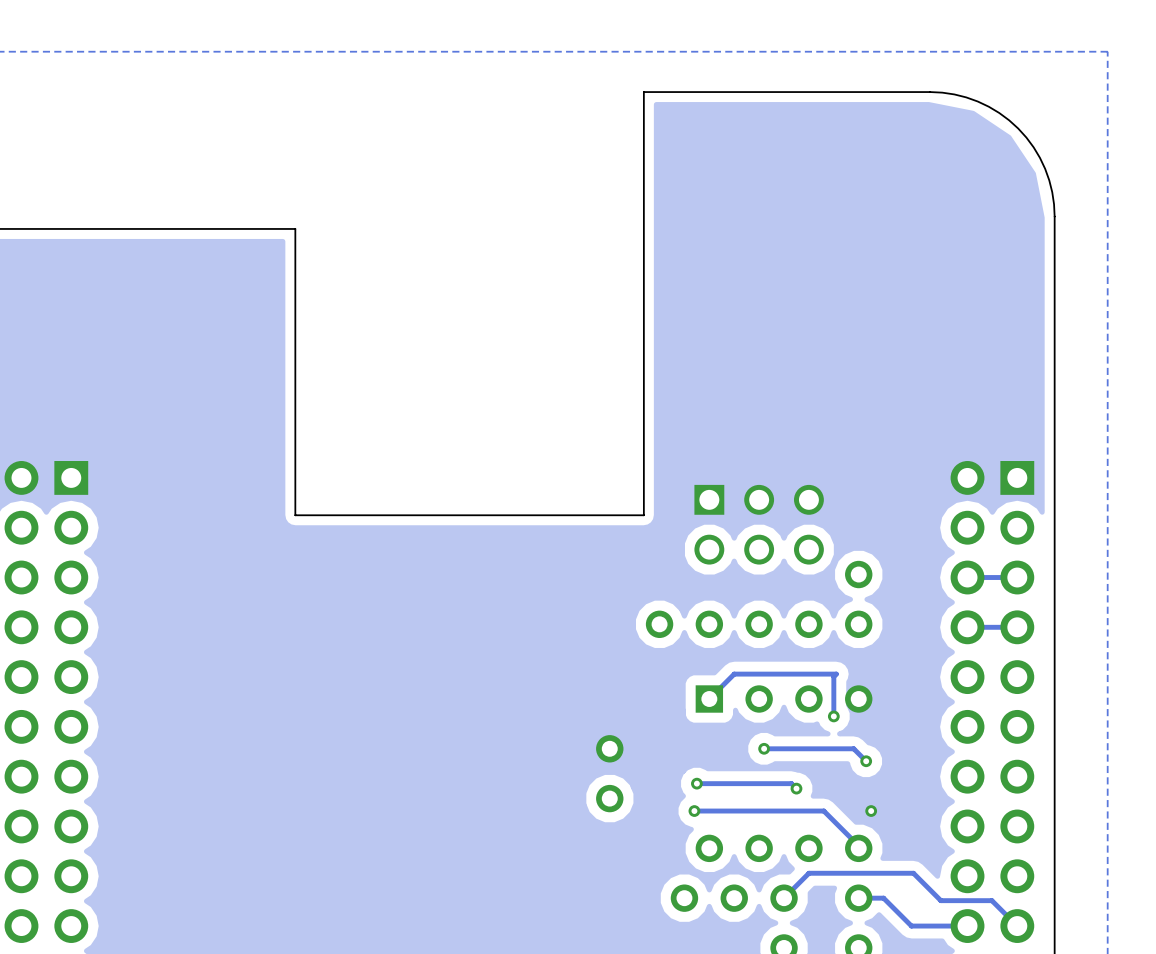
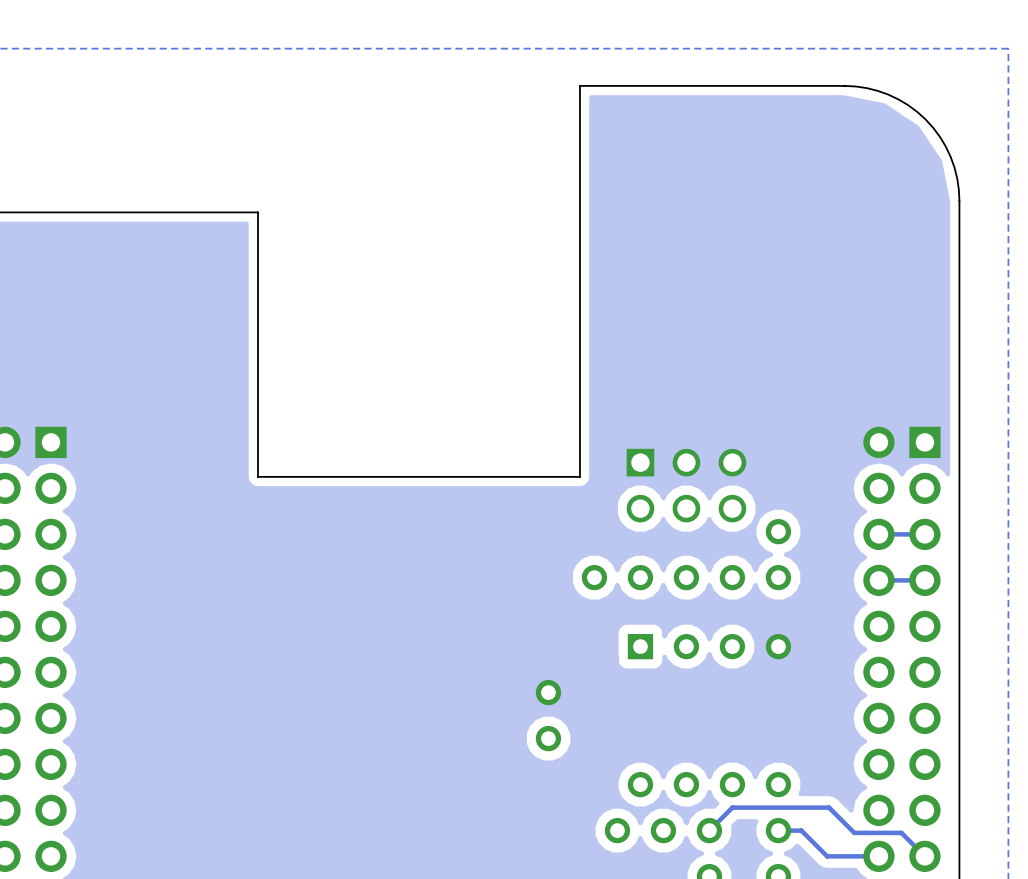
track: (709, 699) (734, 674) (836, 674) (833, 676) (833, 716) -> none
via: (833, 716) -> none
track: (764, 748) (853, 748) (866, 761) -> none
via: (764, 748) -> none
via: (866, 761) -> none
track: (696, 783) (791, 783) (796, 788) -> none
via: (696, 783) -> none
via: (796, 788) -> none
track: (694, 811) (823, 811) (858, 845) (858, 848) -> none
via: (694, 811) -> none
via: (871, 811) -> none

